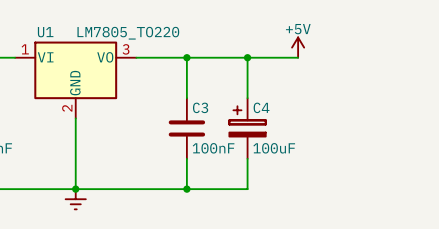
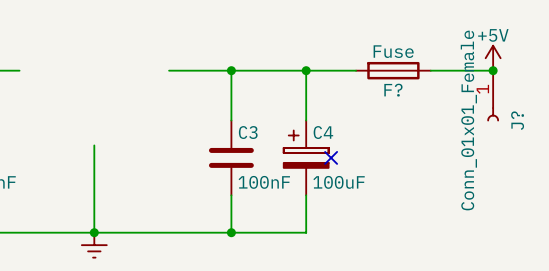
power symbol position: +5V (298, 47) -> +5V (493, 58)
F?: none -> Fuse (393, 70)
wire: none -> (430, 70) (493, 70)
junction: none -> (493, 70)
J?: none -> Conn_01x01_Female (493, 95)
U1: LM7805_TO220 (75, 79) -> none
no-connect mark: none -> (331, 157)

